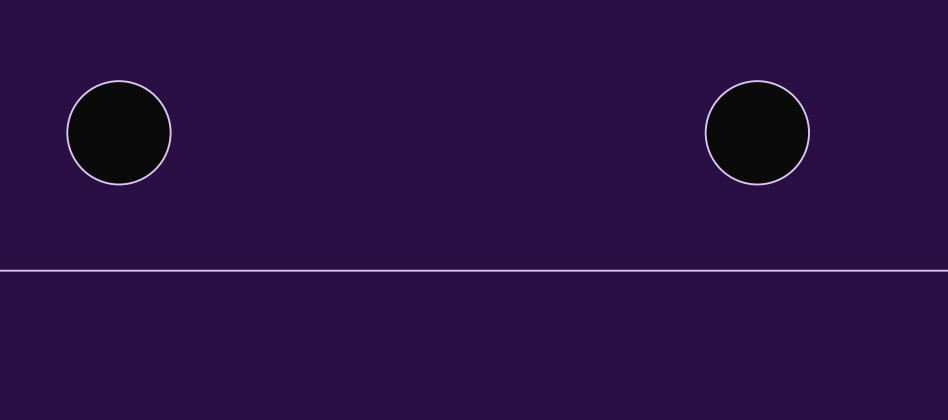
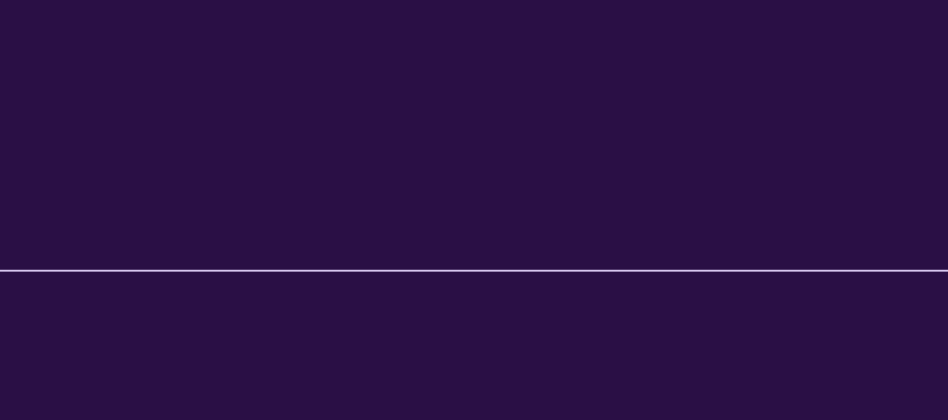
part: (118, 132) -> none
part: (757, 132) -> none

